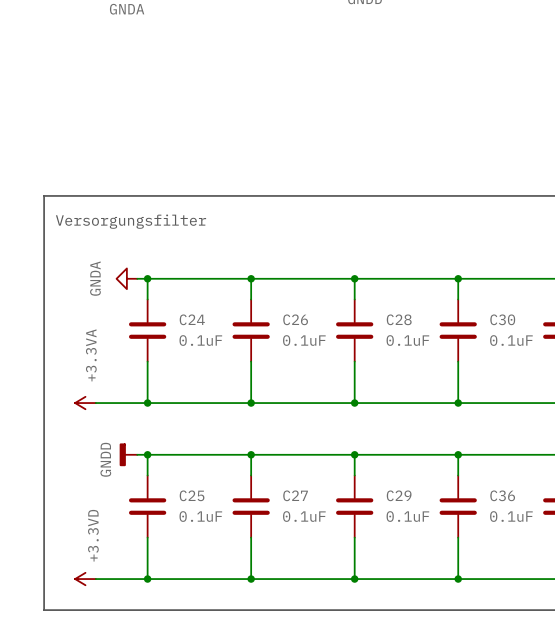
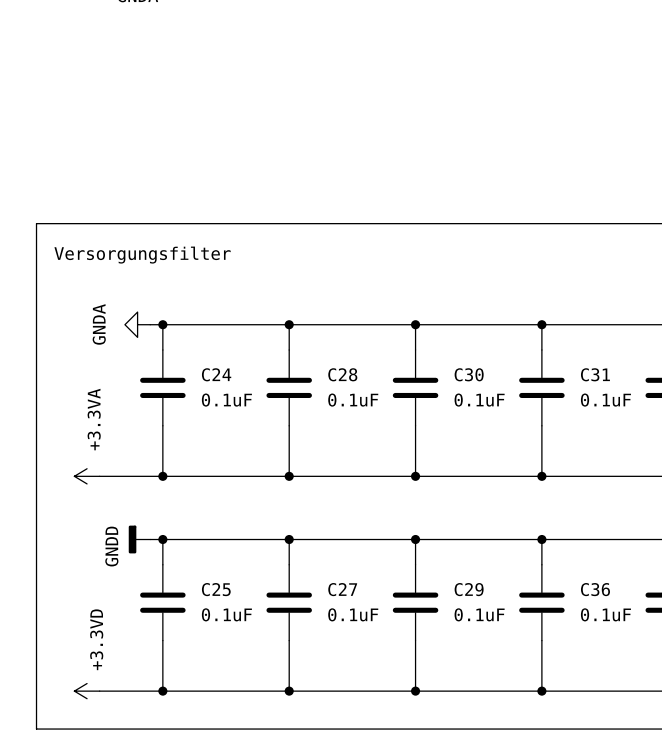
C26 name: C26 (295, 319) -> C28 (342, 374)
C28 name: C28 (399, 319) -> C30 (469, 374)
C30 name: C30 (502, 319) -> C31 (595, 374)

